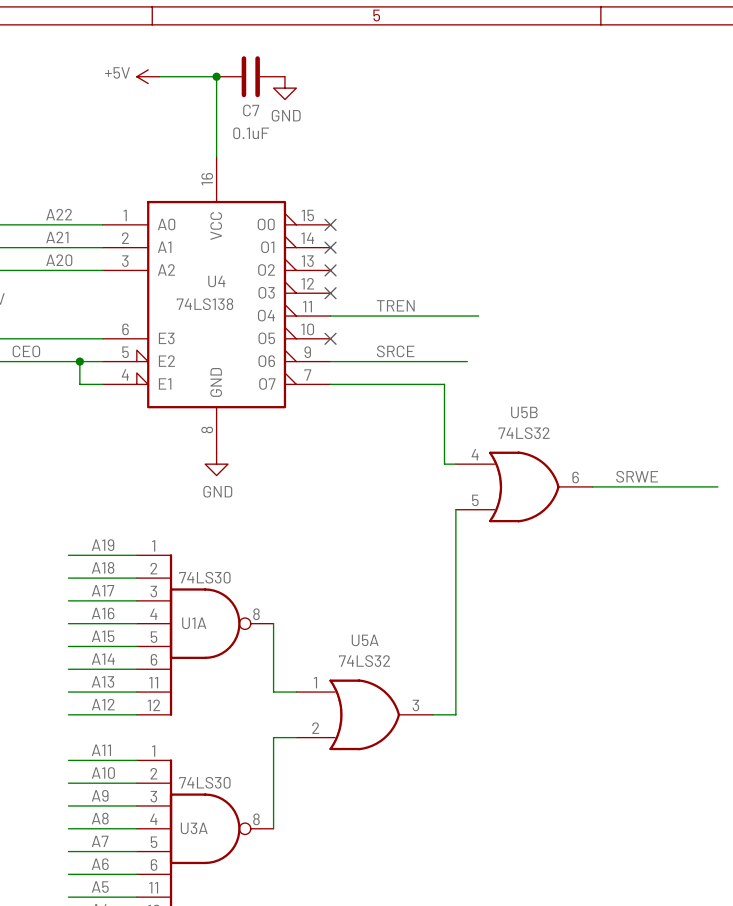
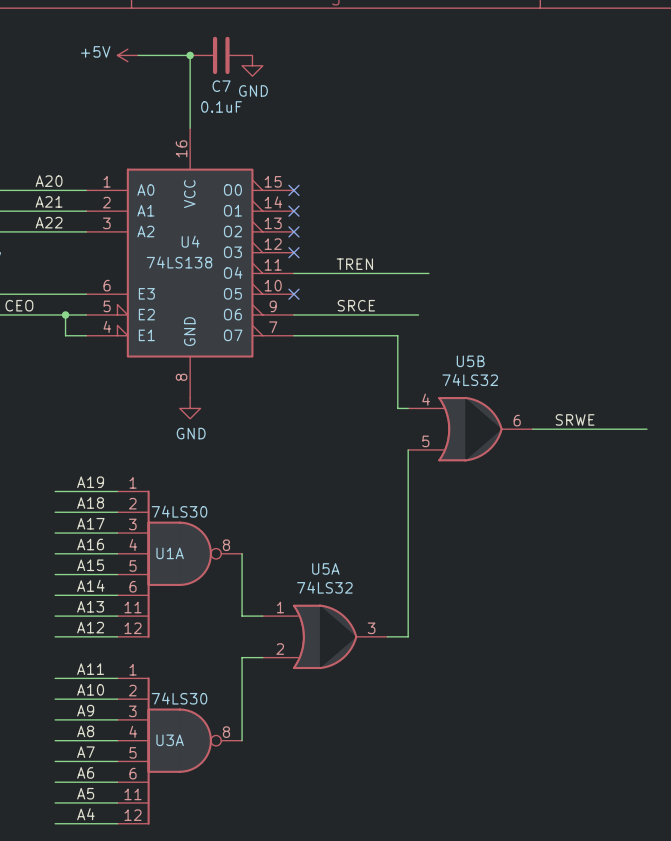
label: A22 (59, 214) -> A20 (49, 181)
label: A20 (59, 260) -> A22 (49, 222)

